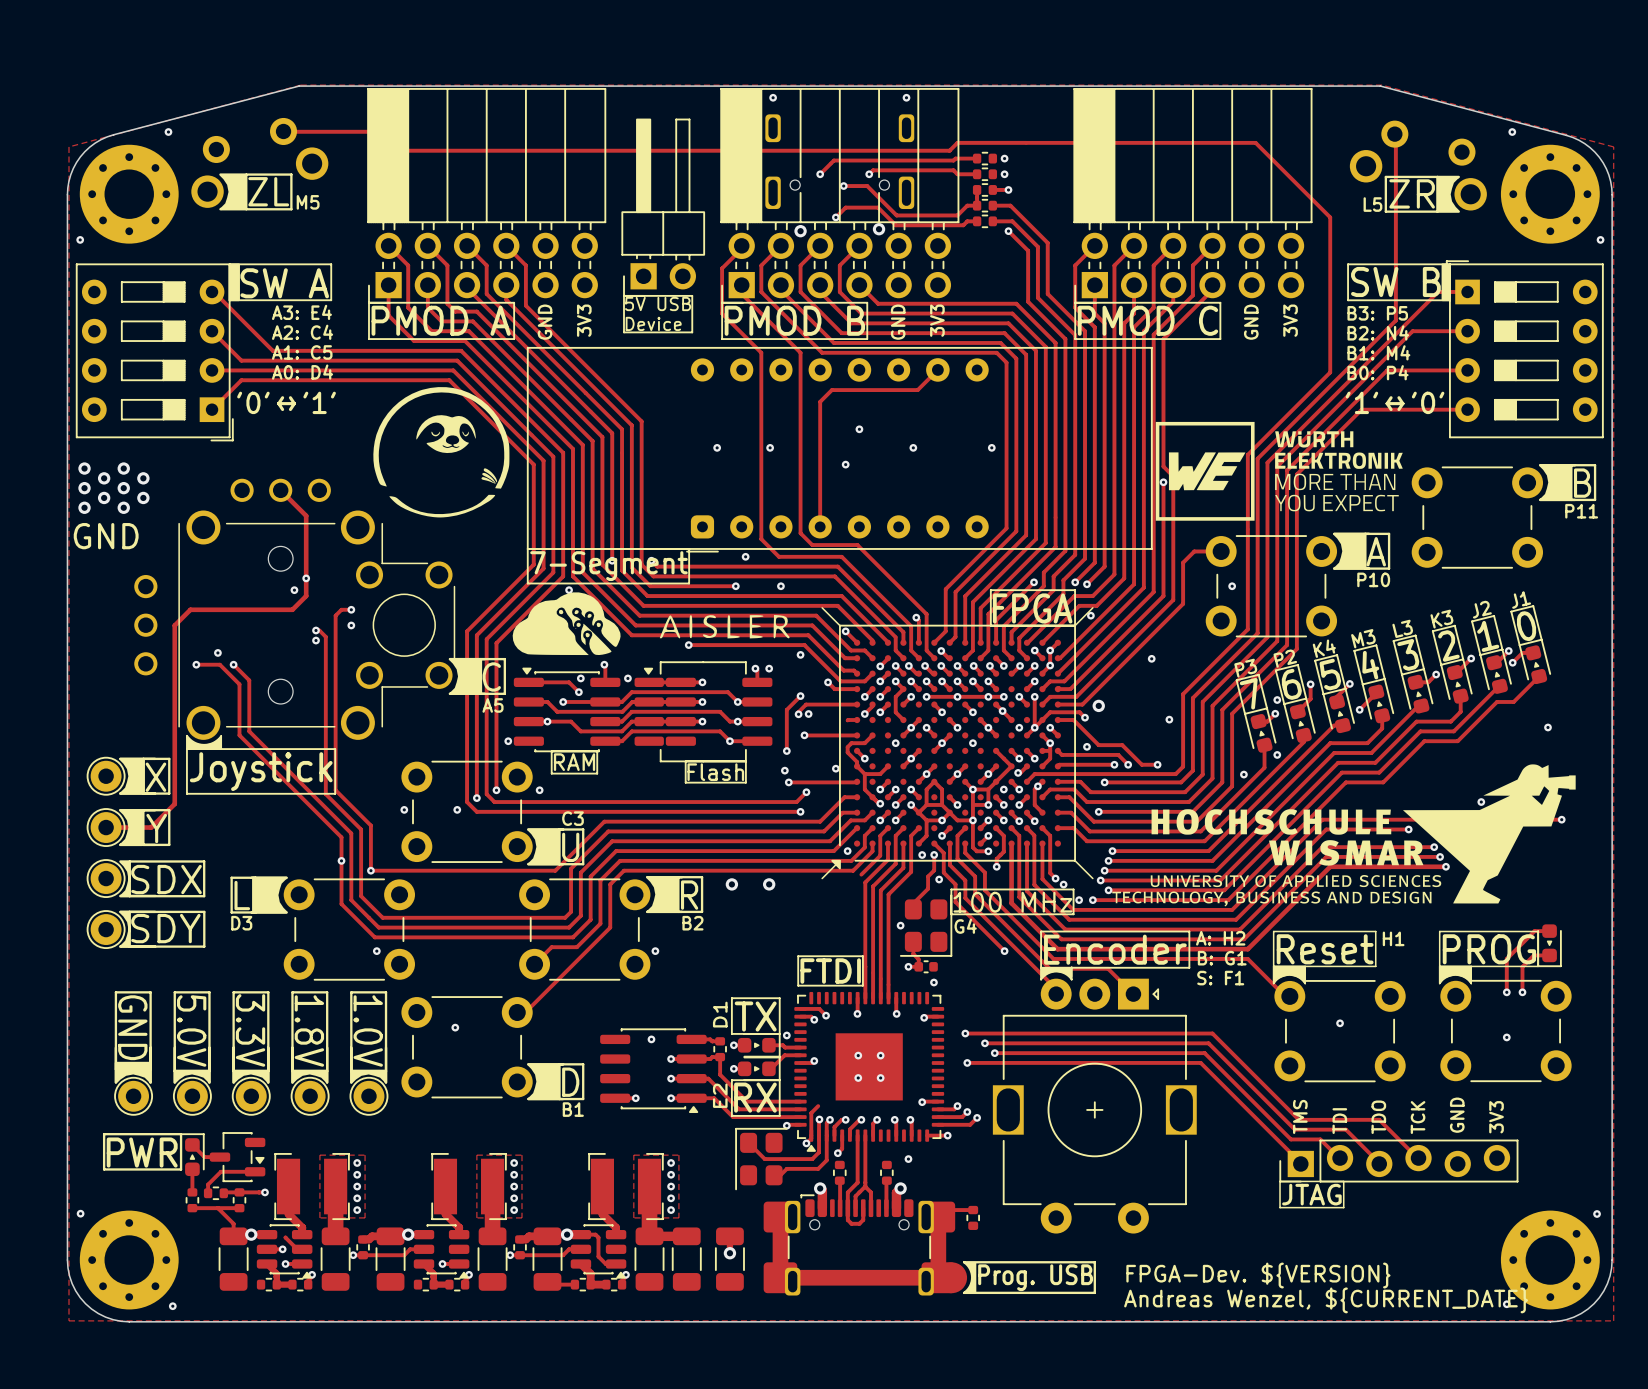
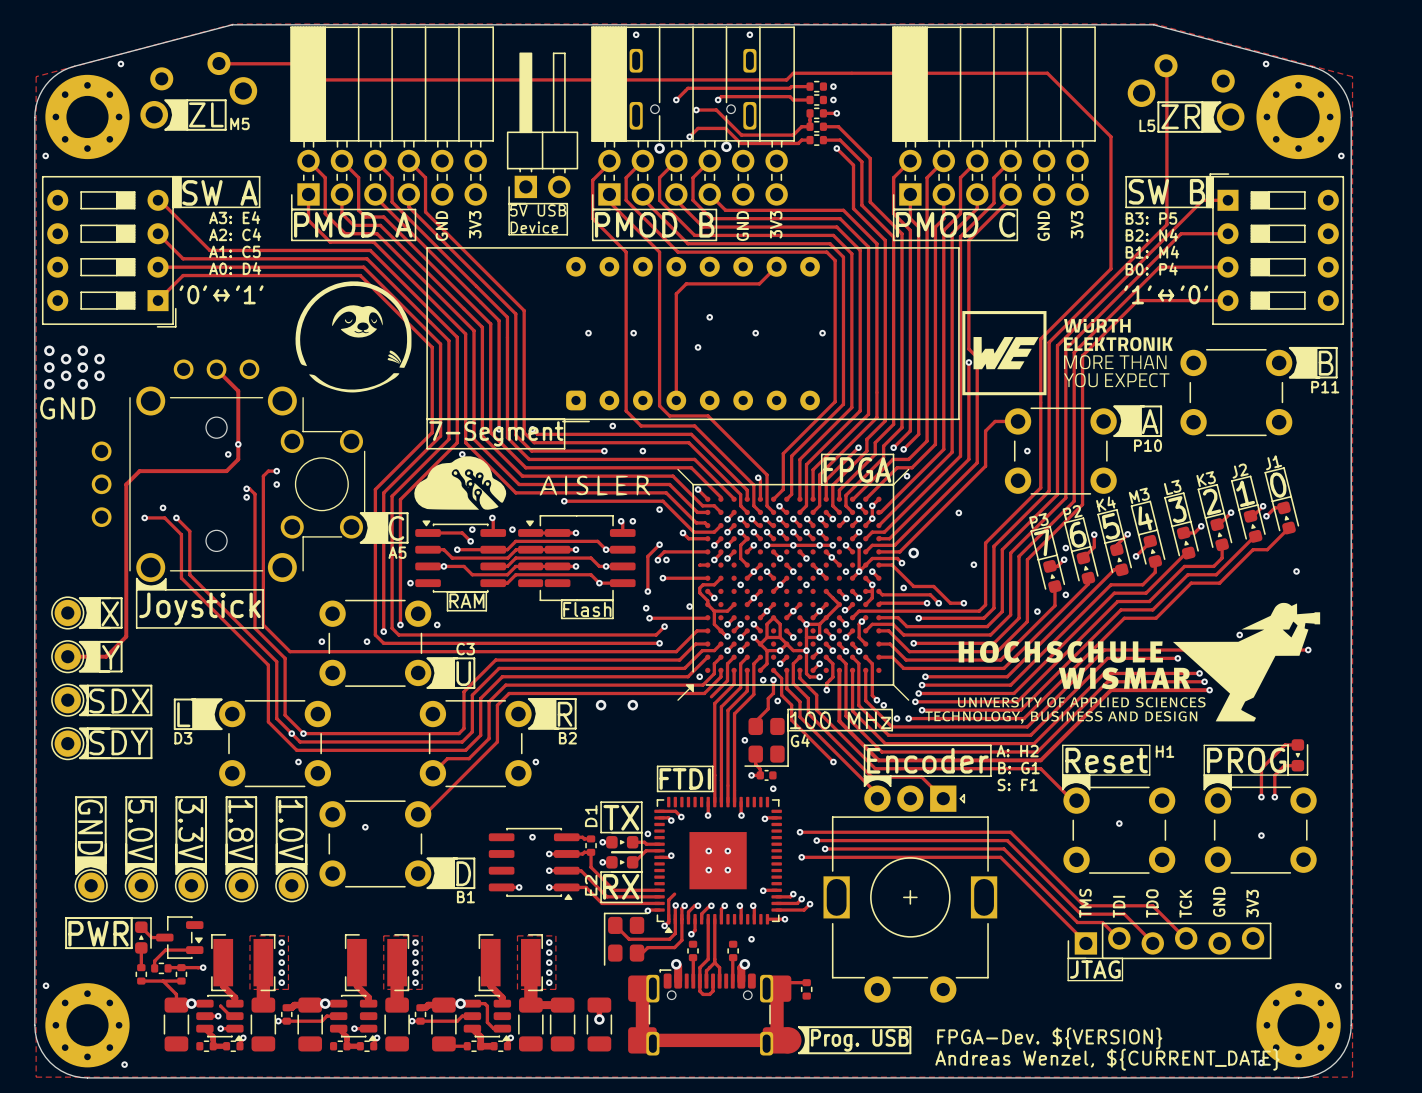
track: (367, 821) (370, 825) (370, 870) (555, 870) (604, 821) -> (290, 651) (492, 651)
via: (341, 860) -> none
via: (370, 870) -> none
via: none -> (291, 733)
via: none -> (303, 733)

